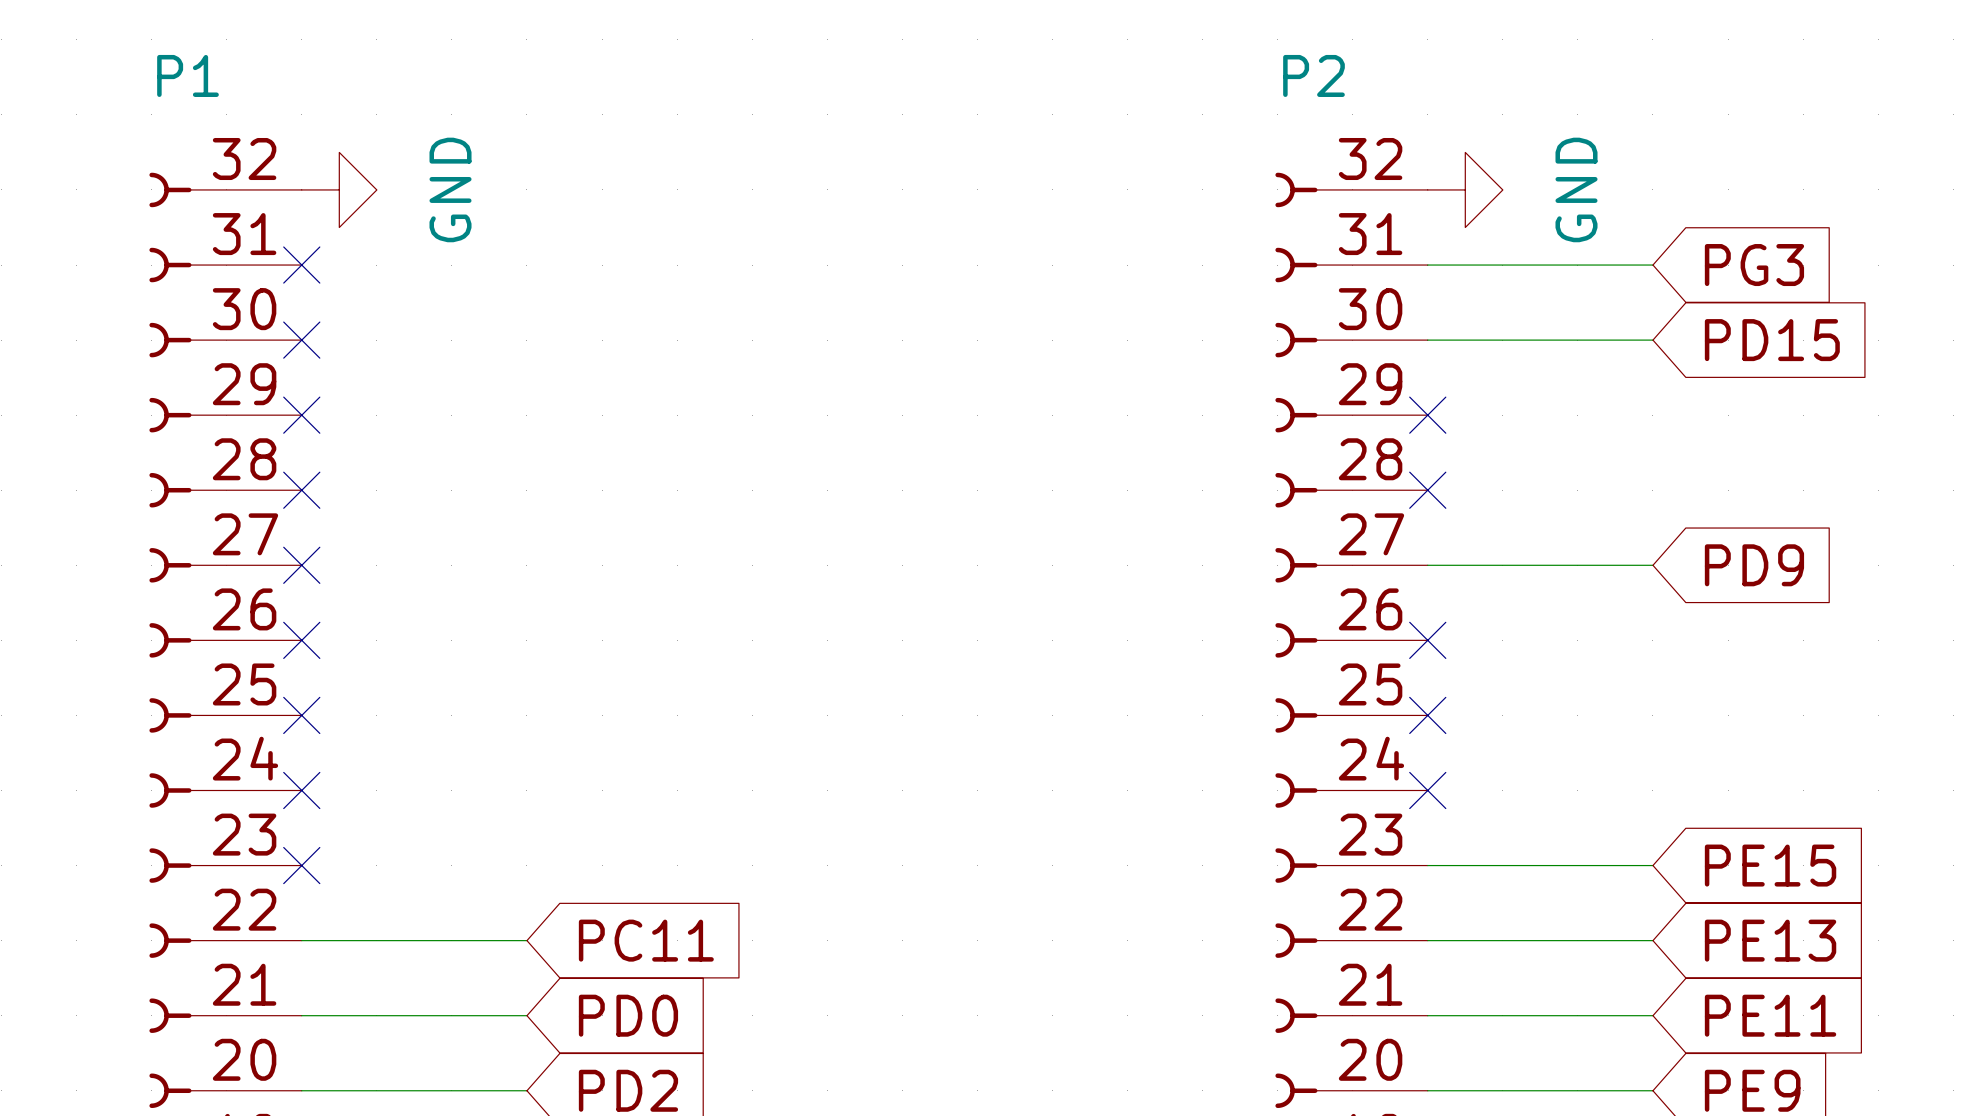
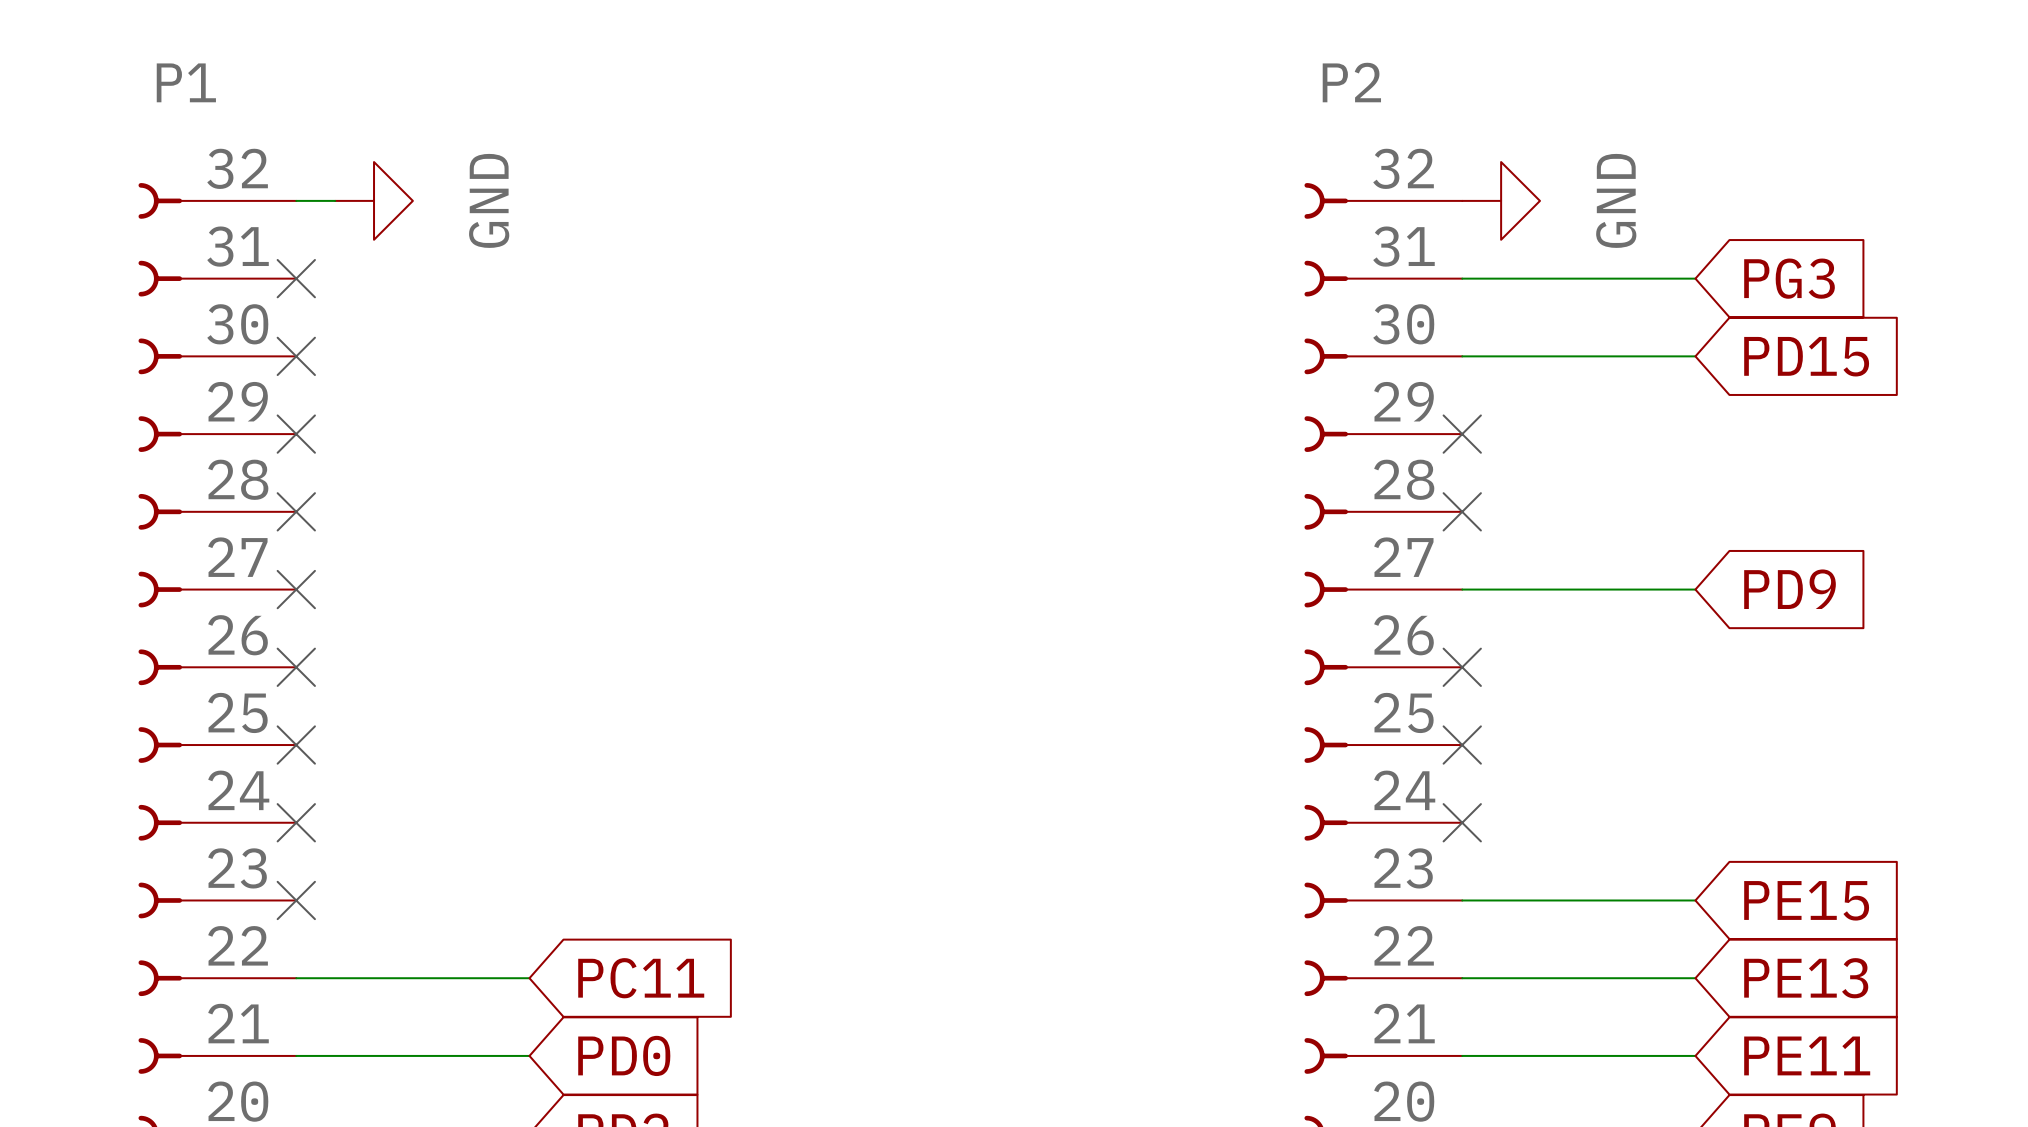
power symbol position: GND (339, 189) -> GND (374, 200)

